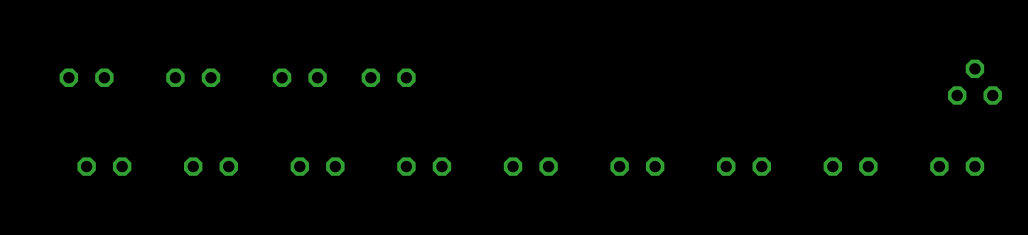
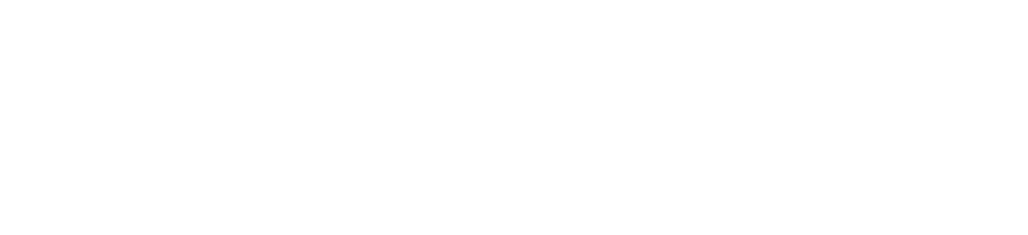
part: (86, 77) -> none
part: (193, 77) -> none
part: (299, 77) -> none
part: (388, 77) -> none
part: (974, 82) -> none
part: (104, 166) -> none
part: (210, 166) -> none
part: (317, 166) -> none
part: (424, 166) -> none
part: (530, 166) -> none
part: (637, 166) -> none
part: (743, 166) -> none
part: (850, 166) -> none
part: (957, 166) -> none

